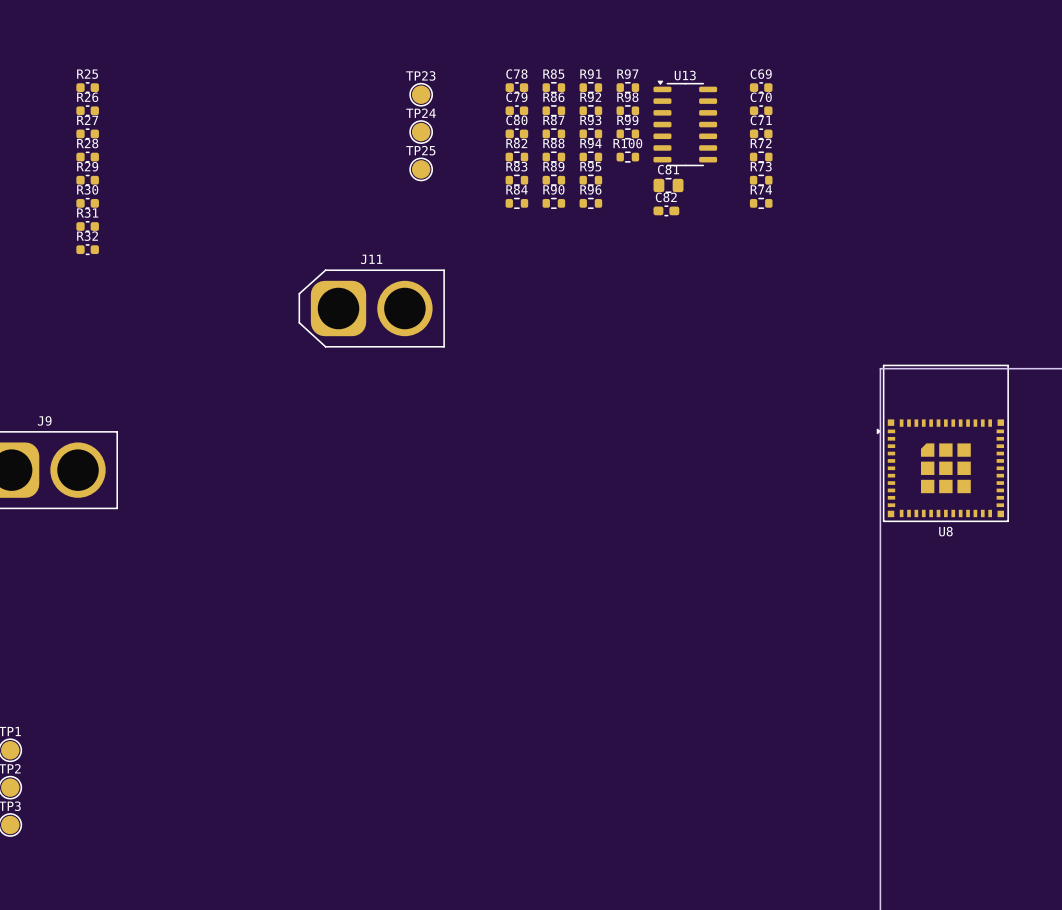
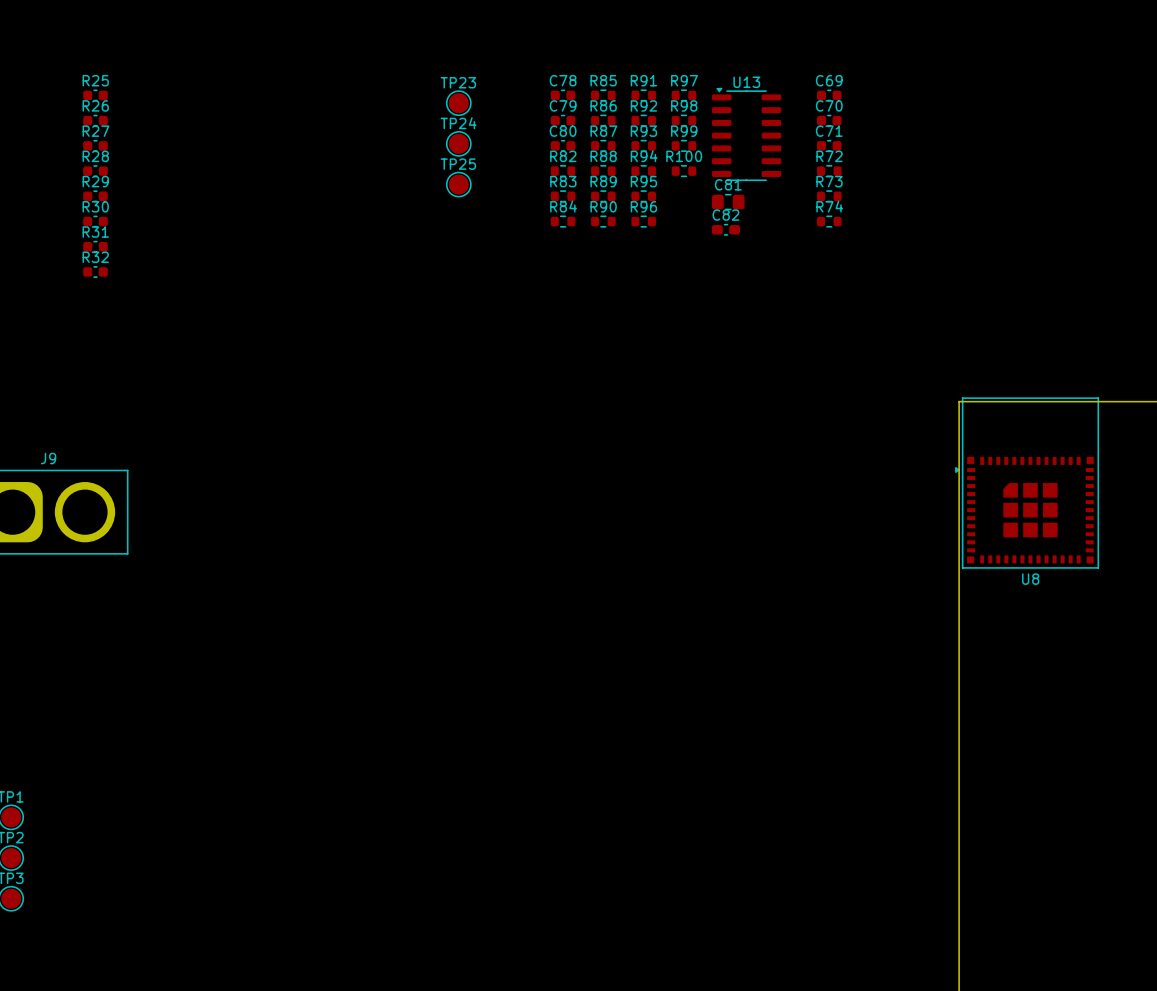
J11: (371, 308) -> none

